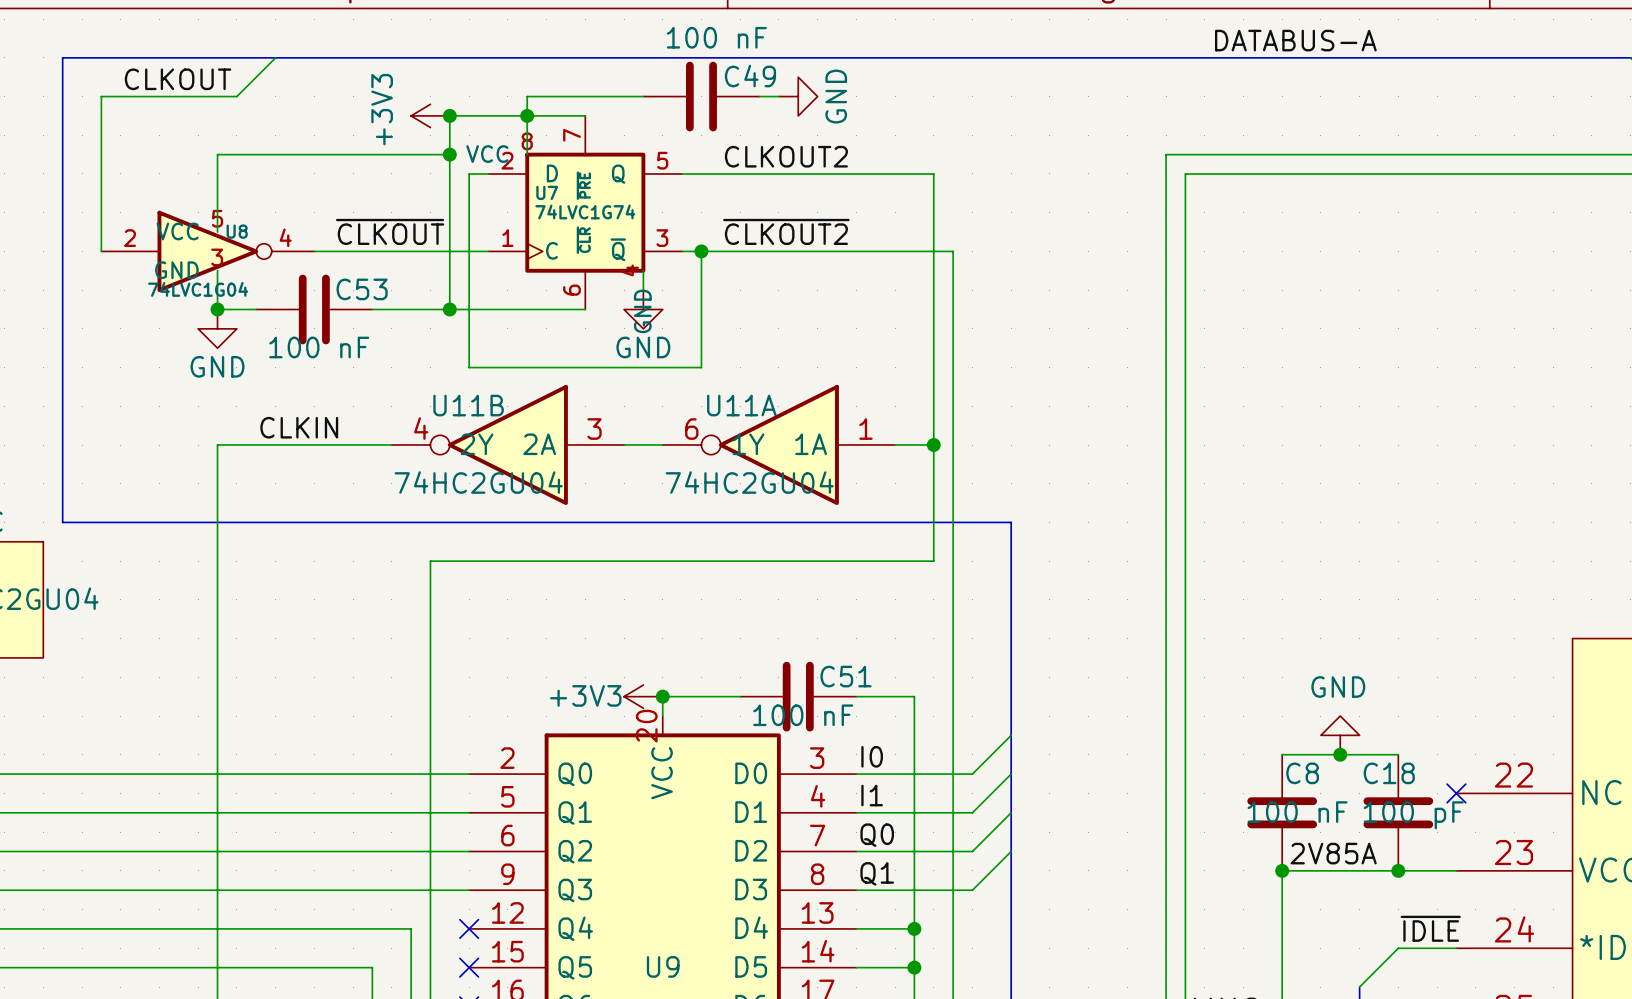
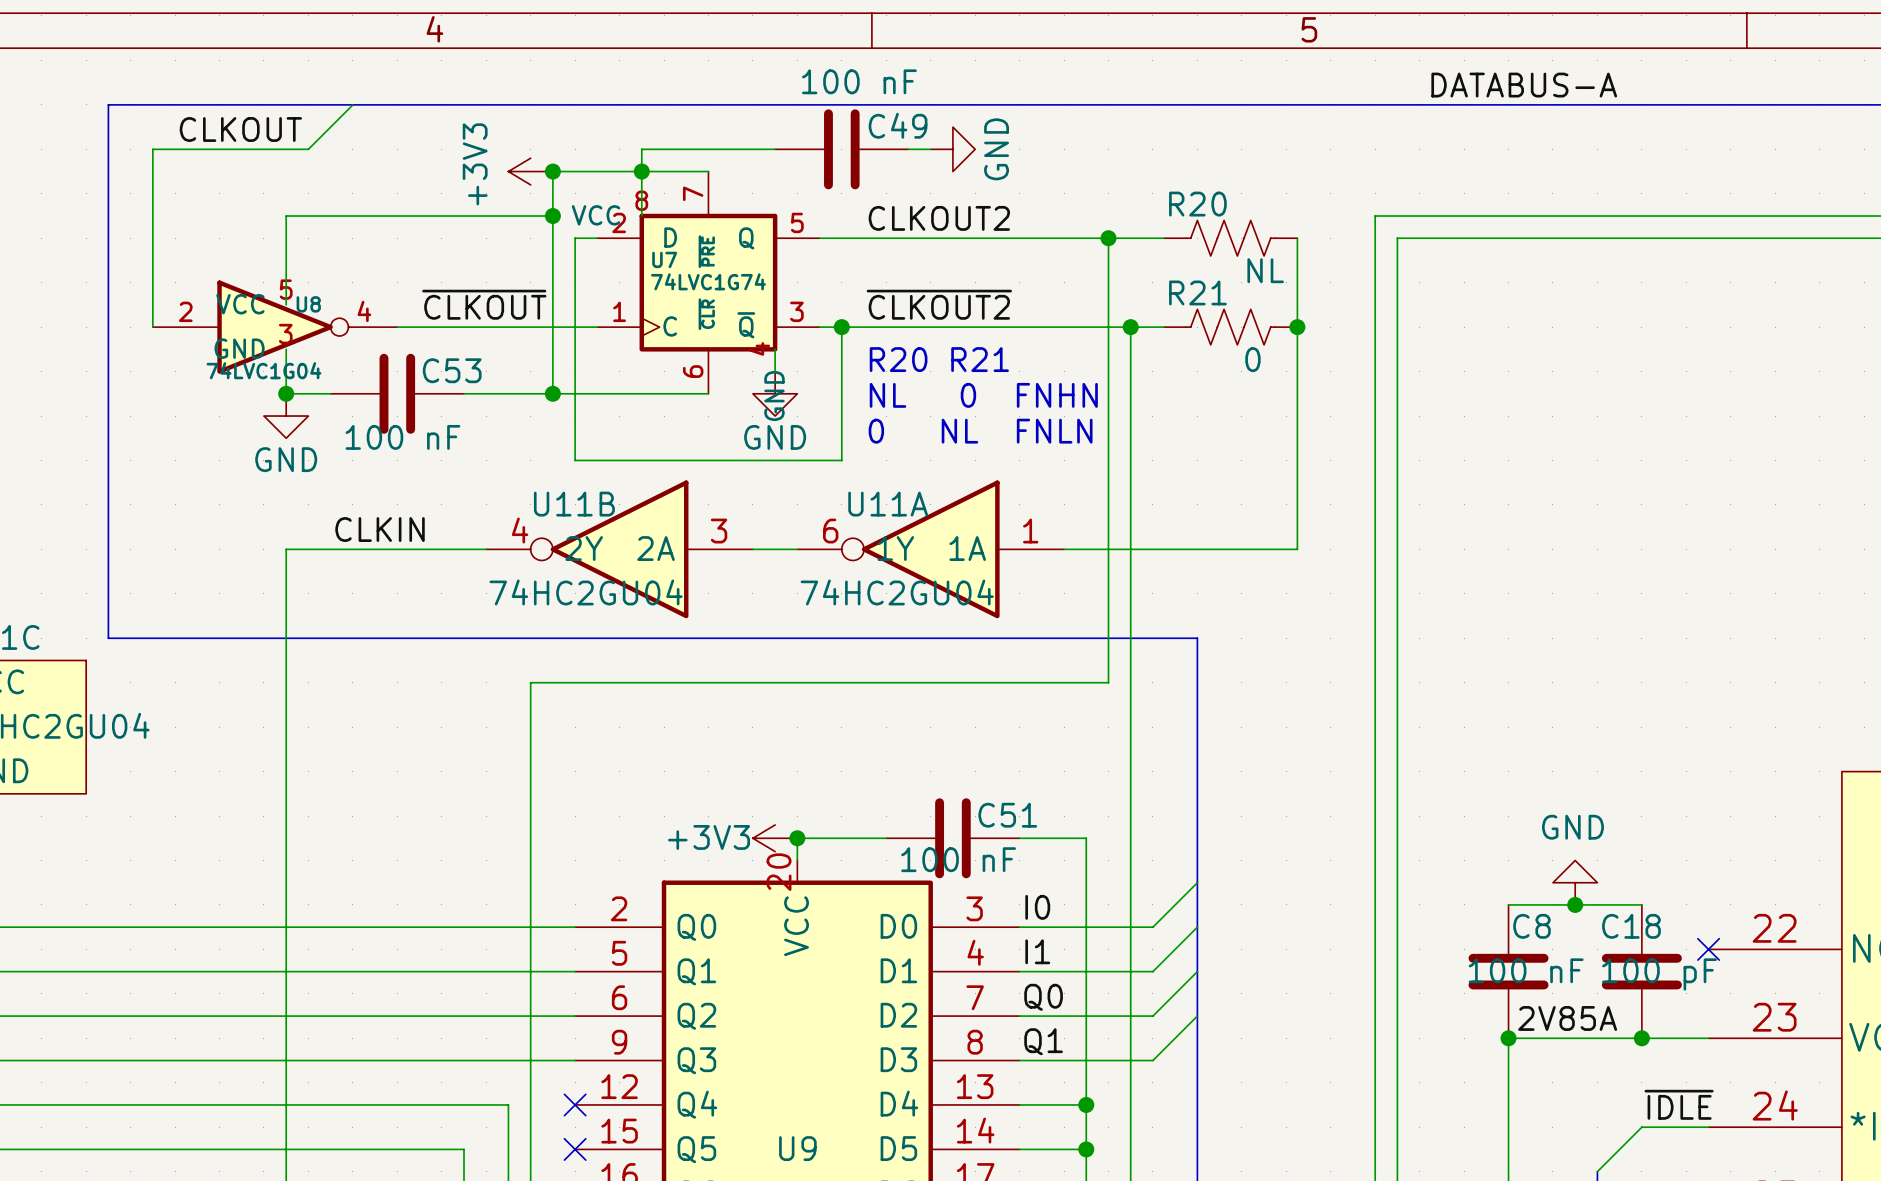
wire: none -> (1108, 238) (1164, 238)
junction: none -> (1108, 238)
R20: none -> NL (1230, 238)
wire: none -> (1297, 238) (1297, 549) (1108, 549)
wire: none -> (1130, 327) (1164, 327)
junction: none -> (1130, 327)
R21: none -> 0 (1230, 327)
junction: none -> (1297, 327)
text: none -> R20 R21 (939, 359)
text: none -> NL 0 FNHN (983, 395)
text: none -> 0 NL FNLN (980, 431)
junction: (933, 445) -> none

